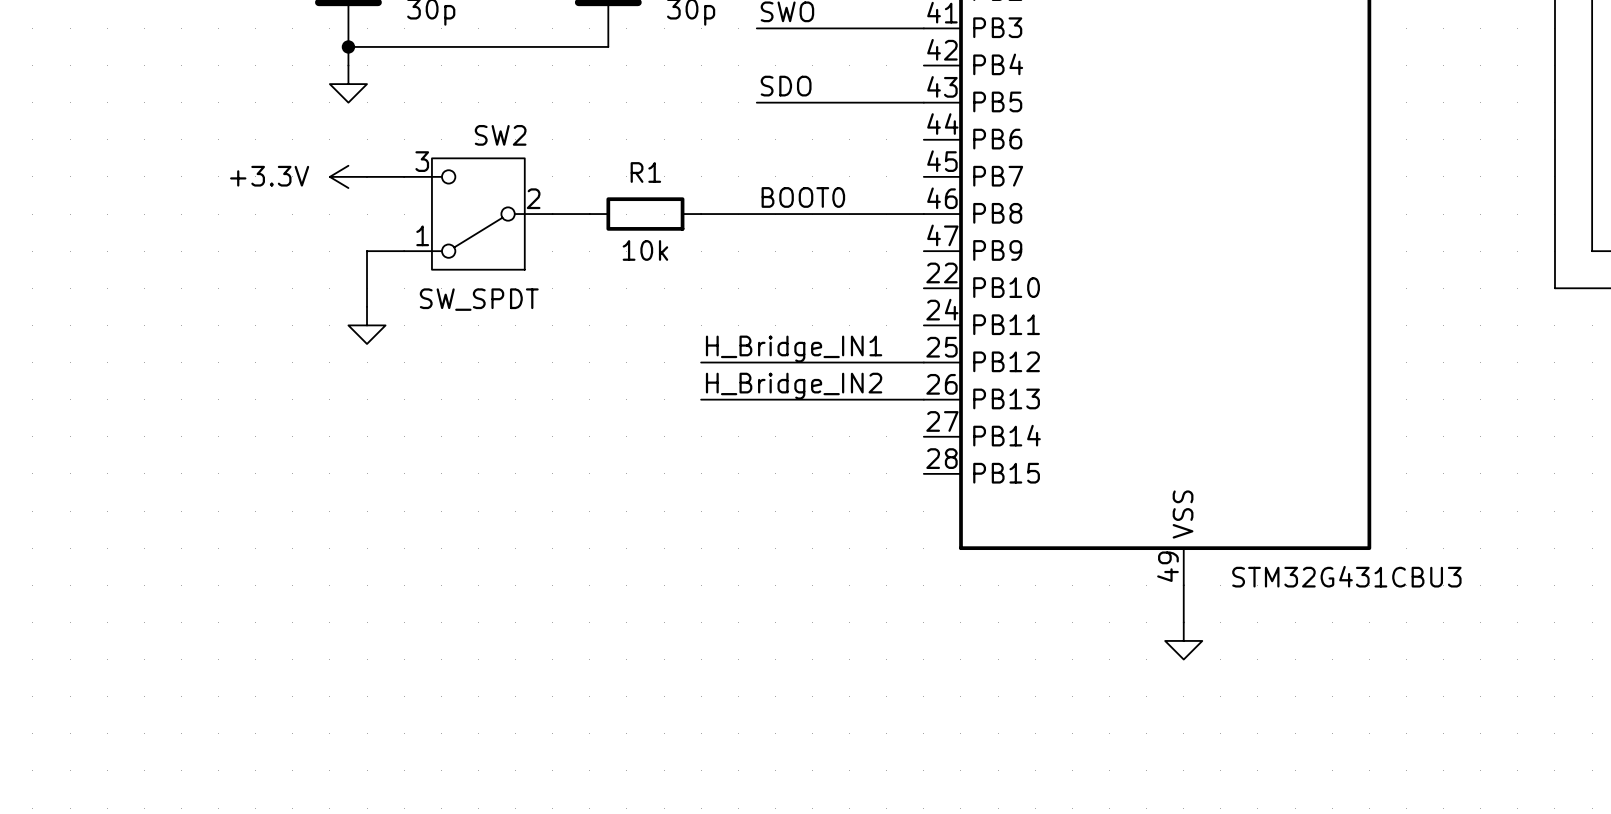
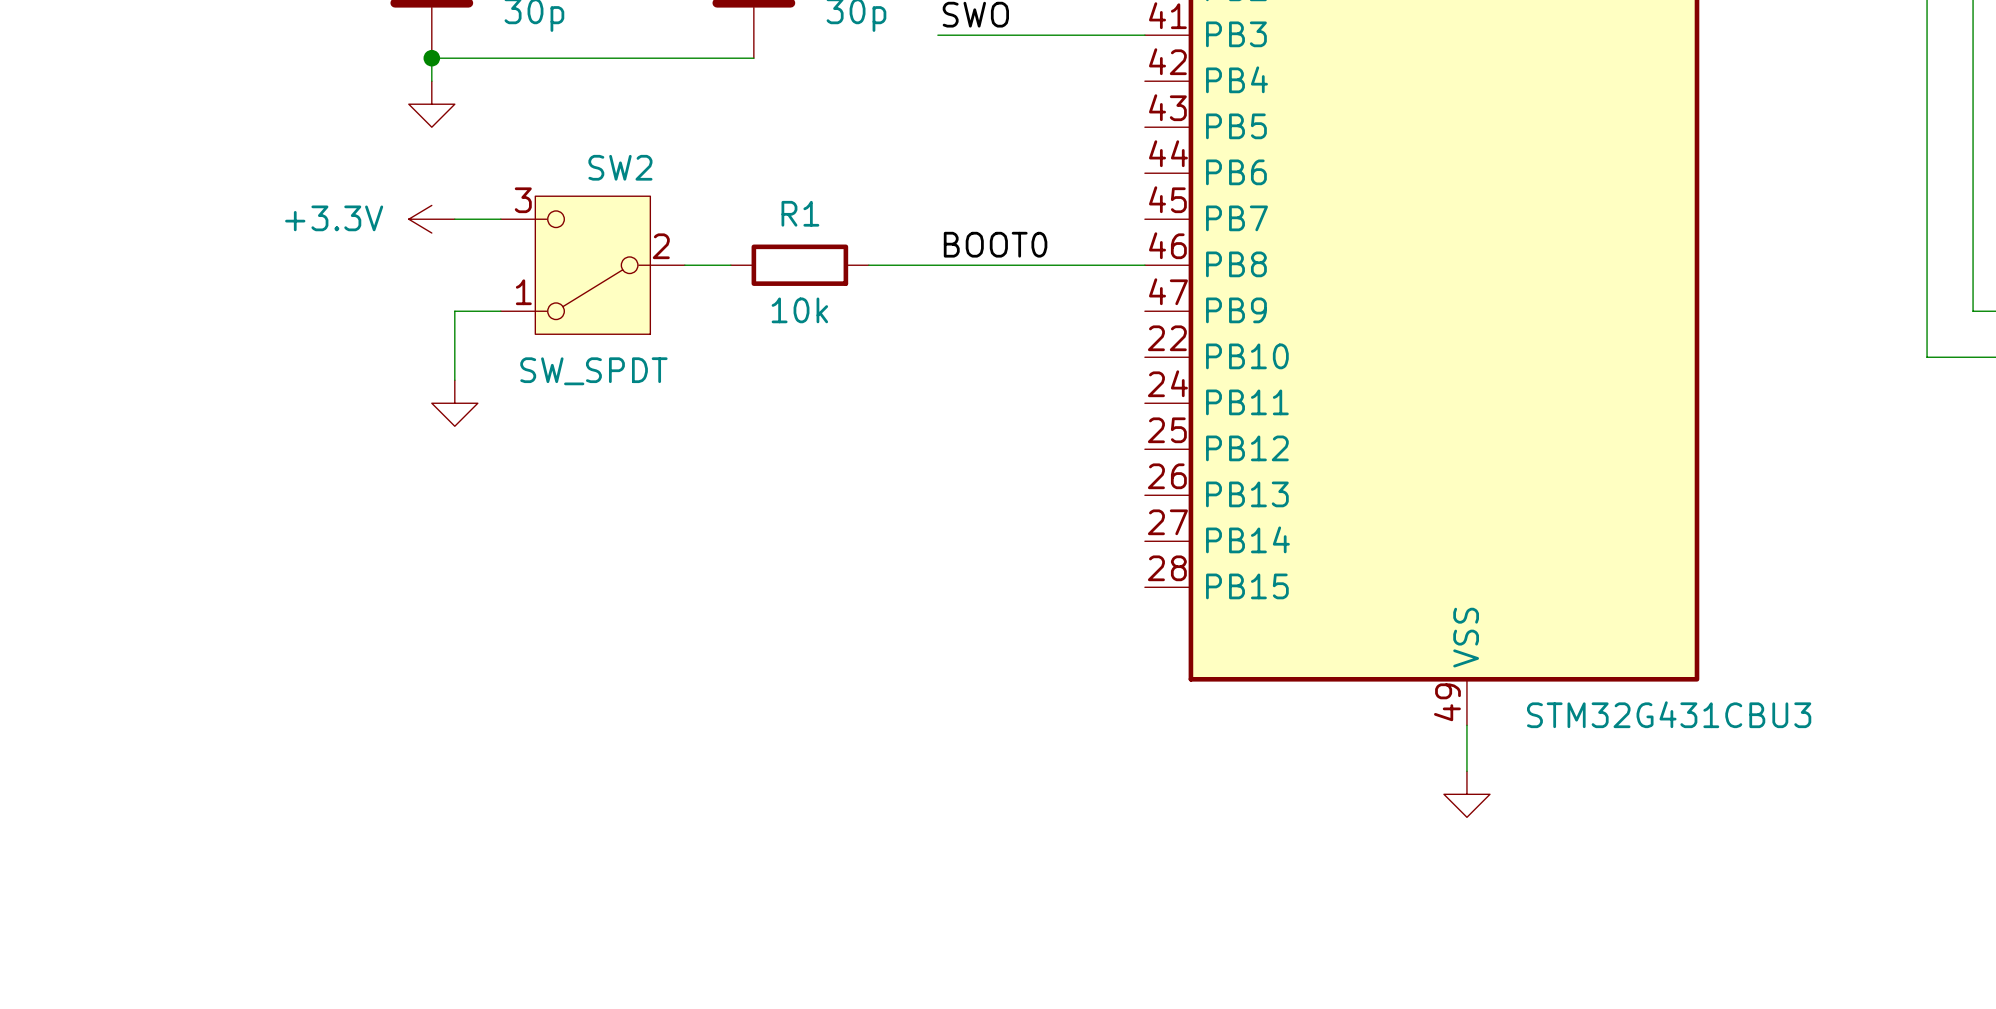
label: SDO (786, 86) -> none
wire: (756, 102) (923, 102) -> none
label: H_Bridge_IN1 (794, 349) -> none
wire: (701, 362) (923, 362) -> none
label: H_Bridge_IN2 (794, 386) -> none
wire: (701, 399) (923, 399) -> none

